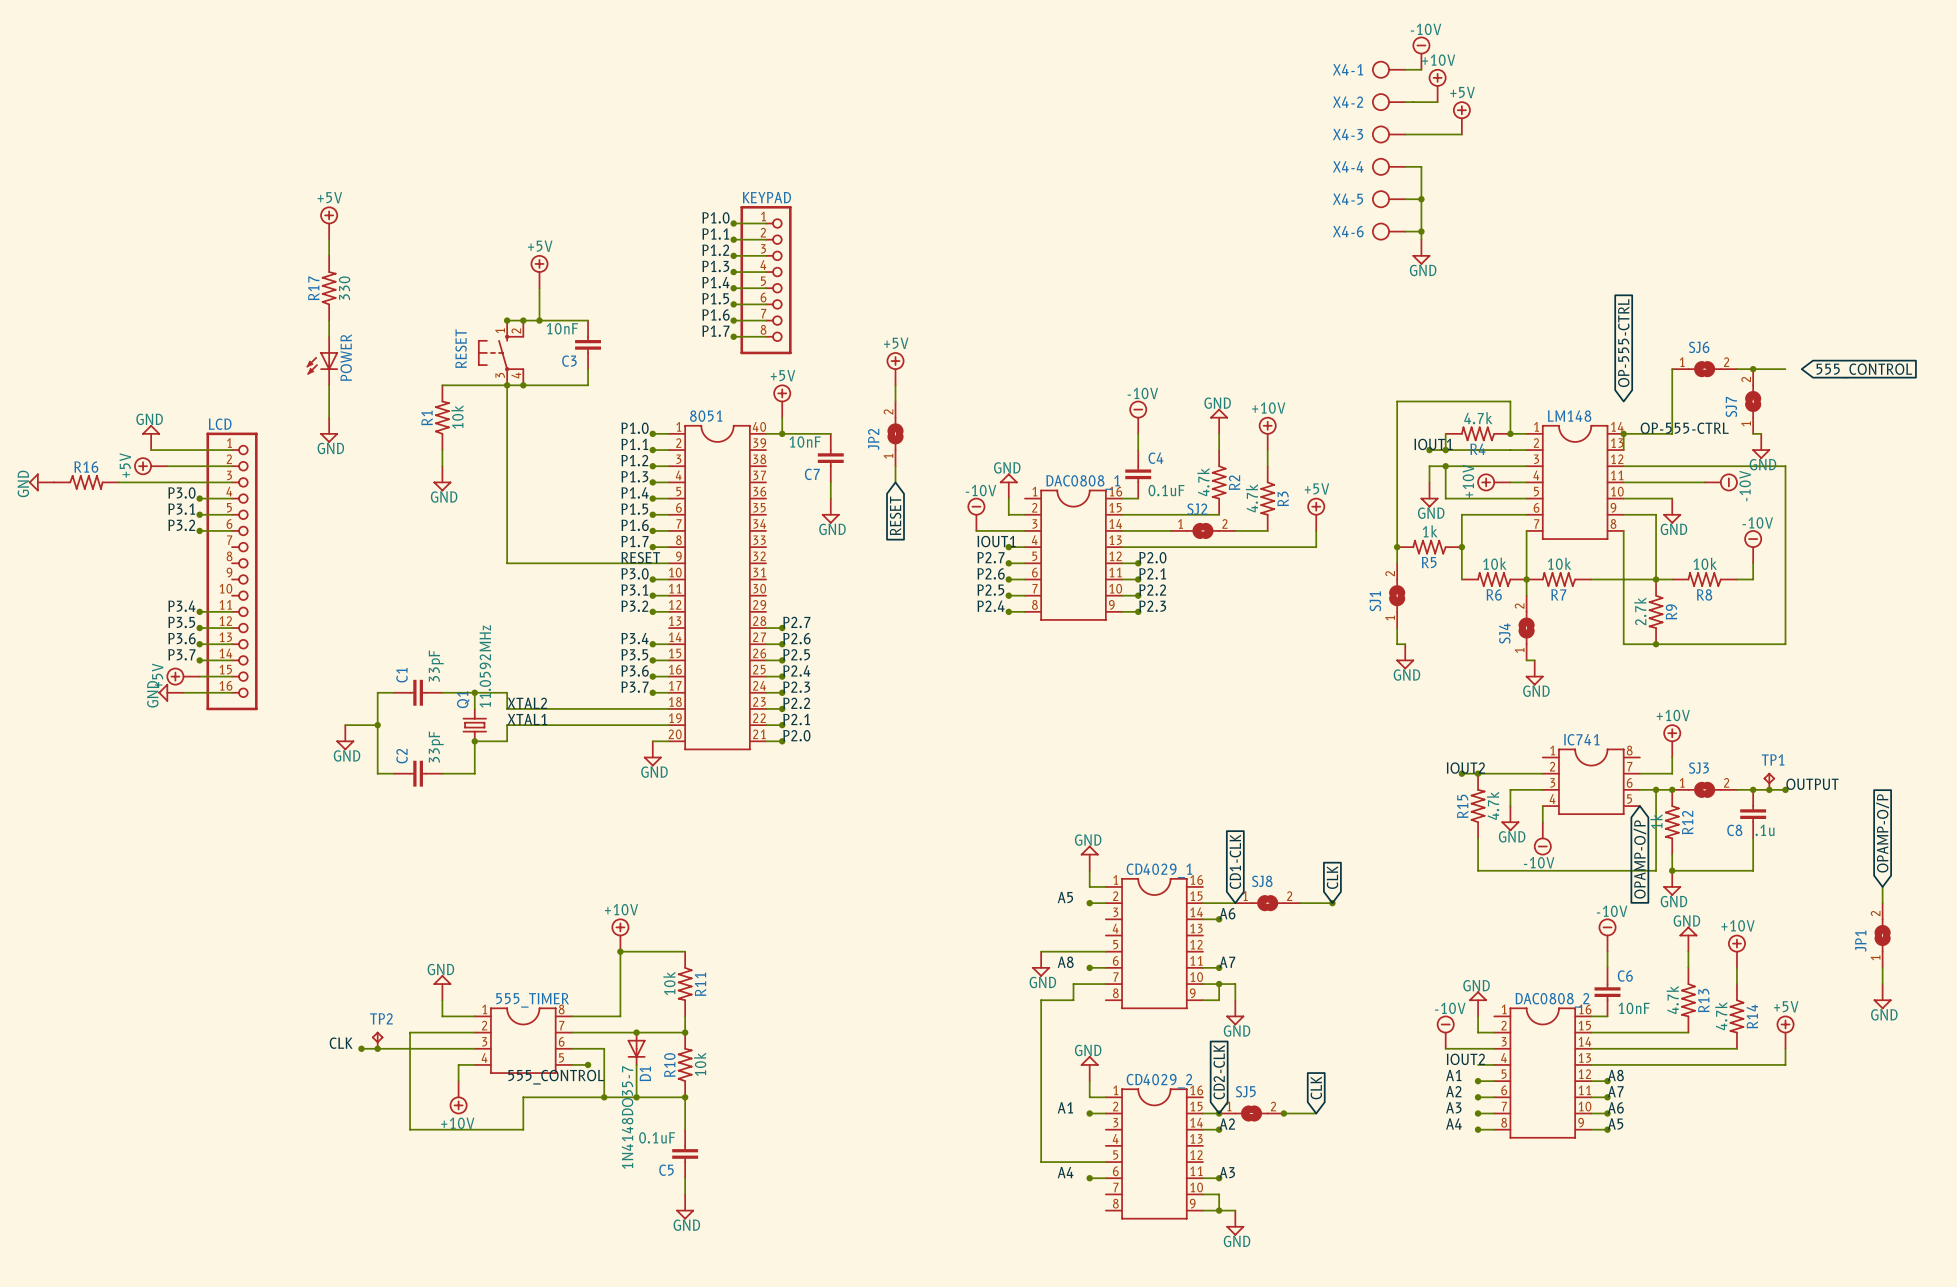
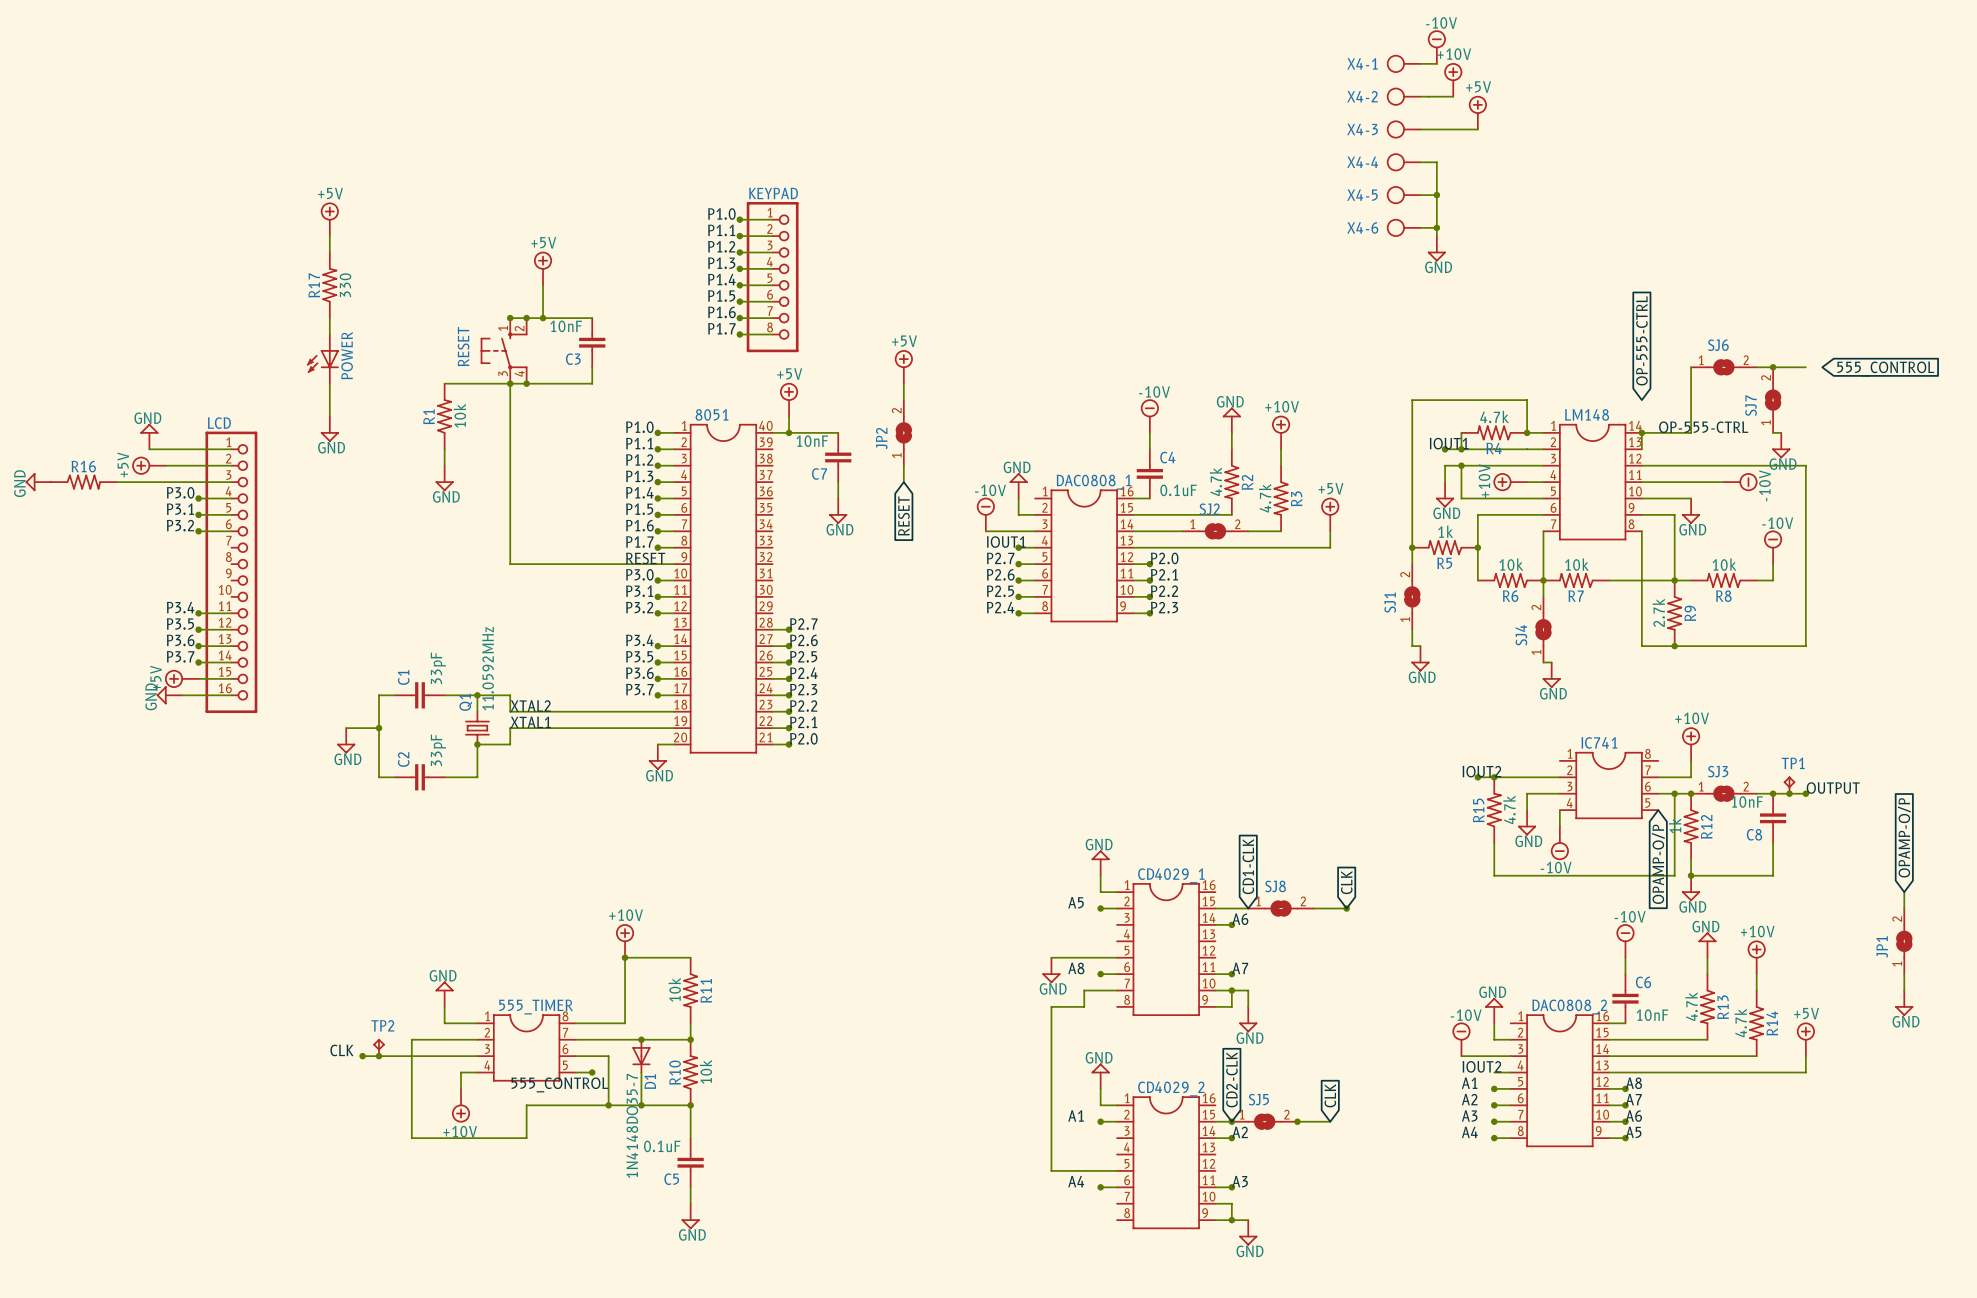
C8 value: .1u (1765, 830) -> 10nF (1747, 801)

